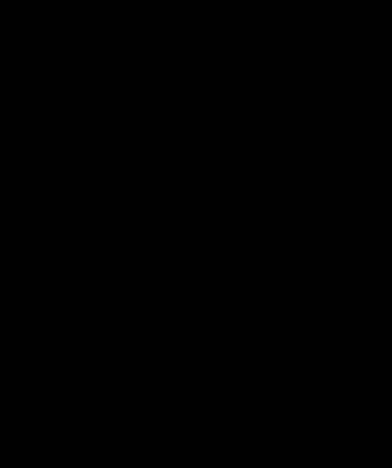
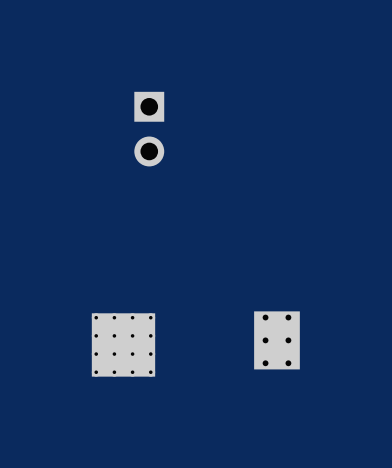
part: none -> (149, 129)
part: none -> (276, 340)
part: none -> (123, 344)

